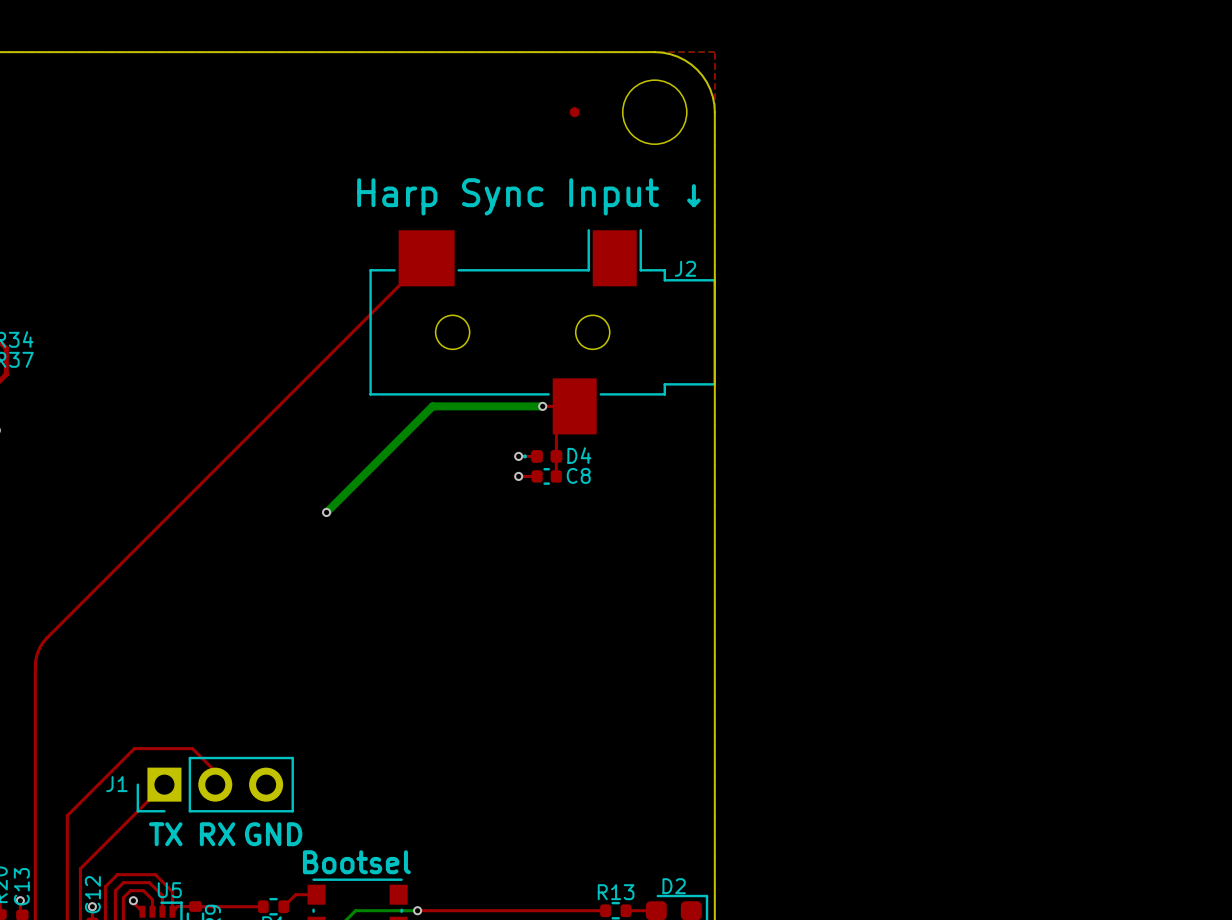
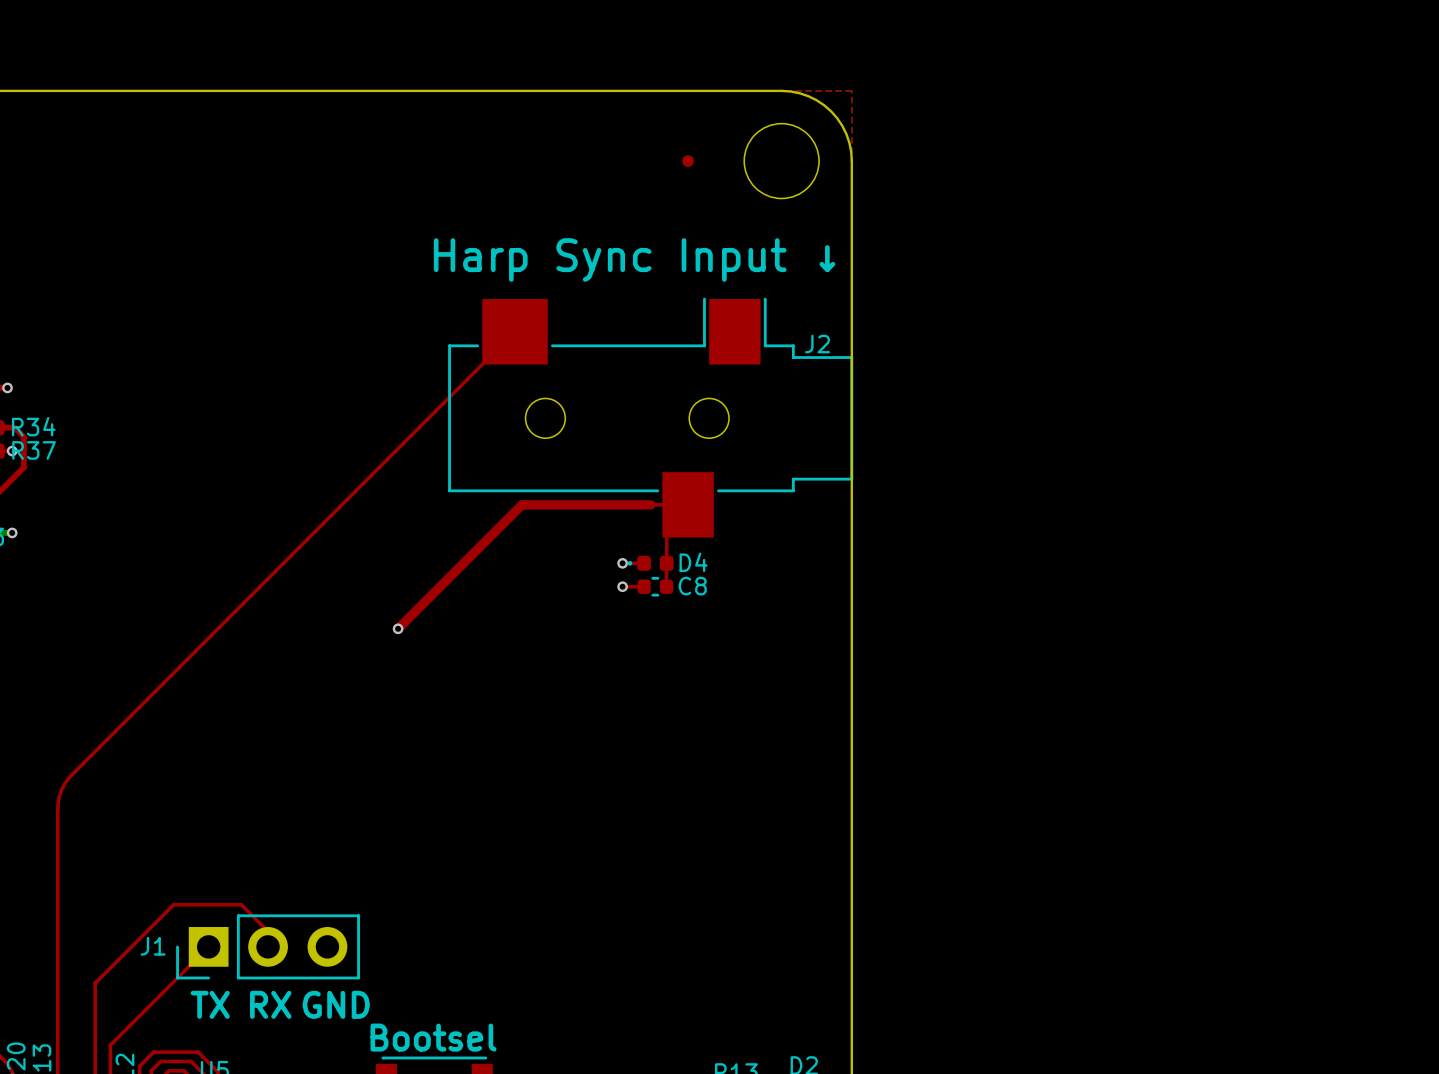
top track: none -> (650, 504) (522, 504) (398, 628)
bottom track: (542, 406) (432, 406) (326, 512) -> none
via: (542, 406) -> none

